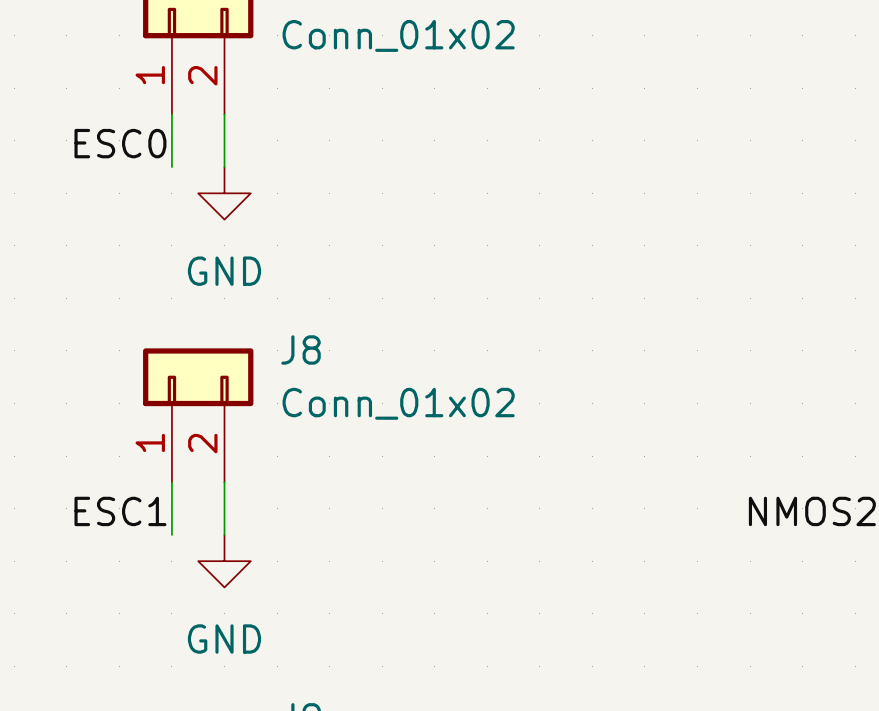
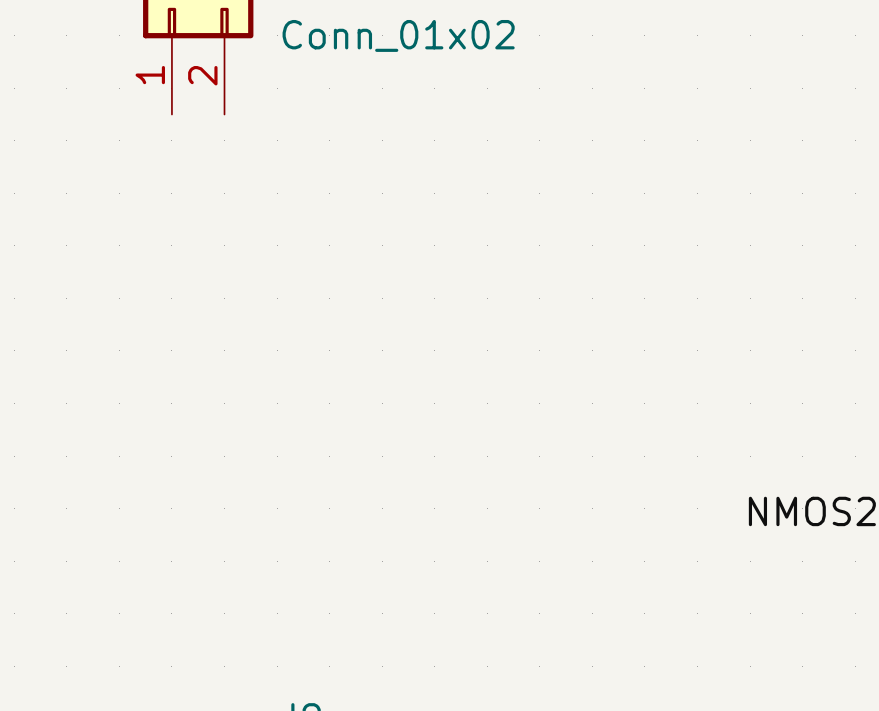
wire: (171, 114) (171, 167) -> none
wire: (224, 114) (224, 167) -> none
label: ESC0 (120, 143) -> none
power symbol: GND (224, 193) -> none
J8: Conn_01x02 (198, 415) -> none
wire: (171, 482) (171, 534) -> none
wire: (224, 482) (224, 534) -> none
label: ESC1 (120, 511) -> none
power symbol: GND (224, 561) -> none

